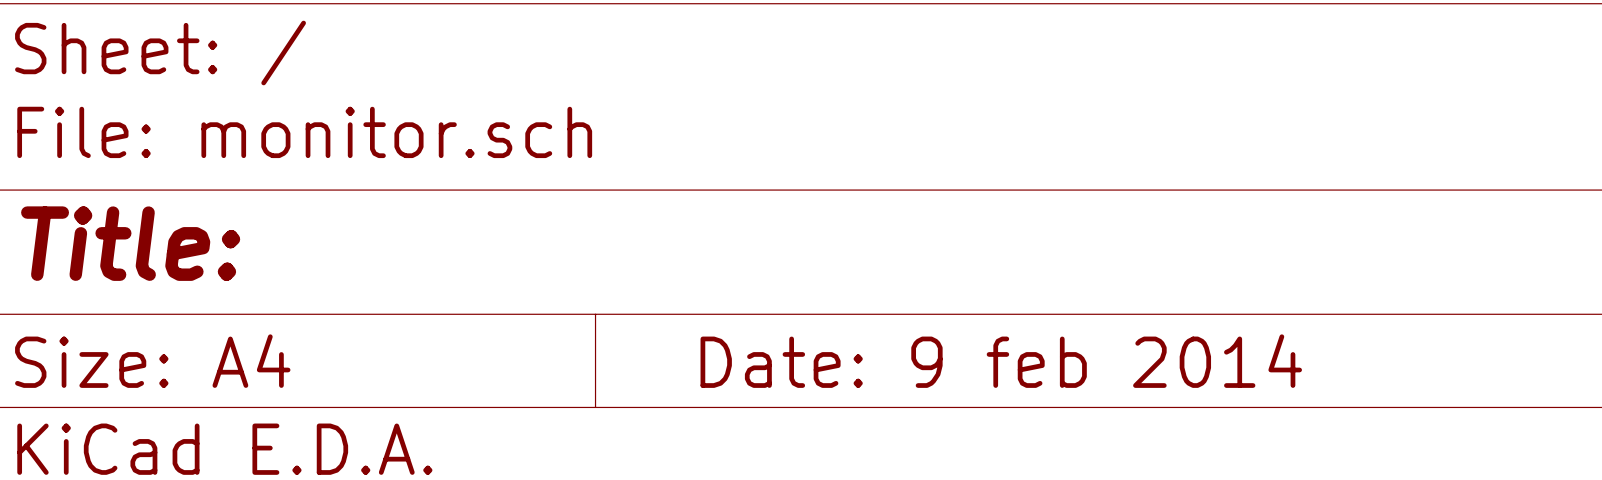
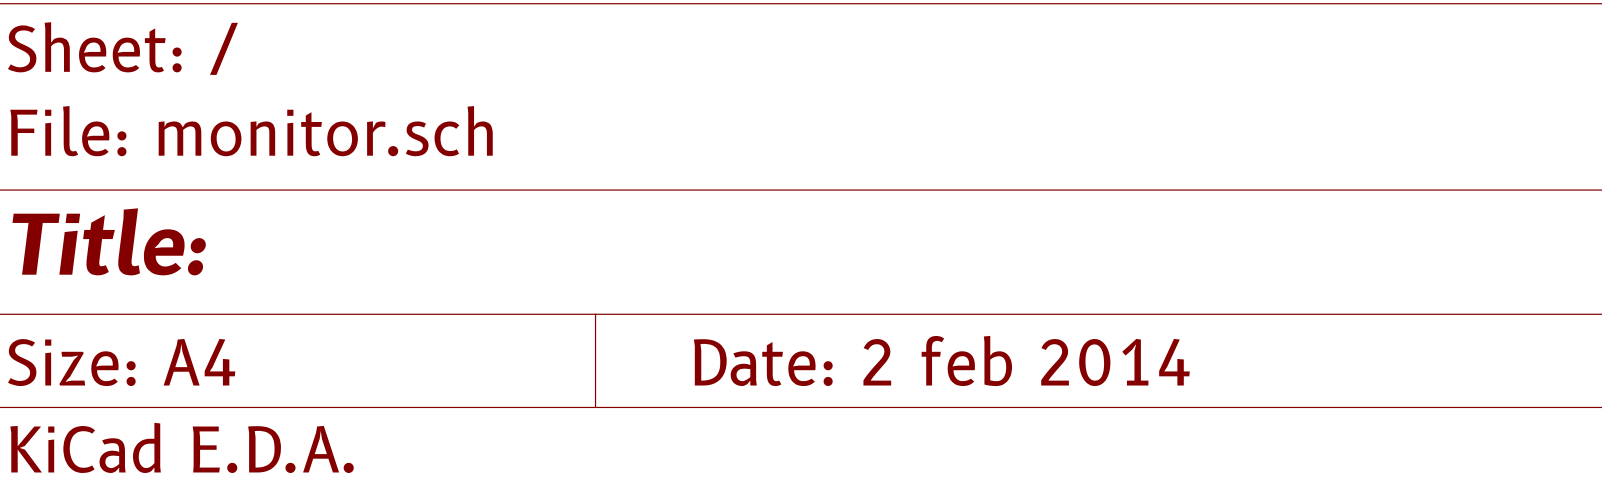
title block: Date: 9 feb 2014 (1001, 361) -> Date: 2 feb 2014 (941, 360)

